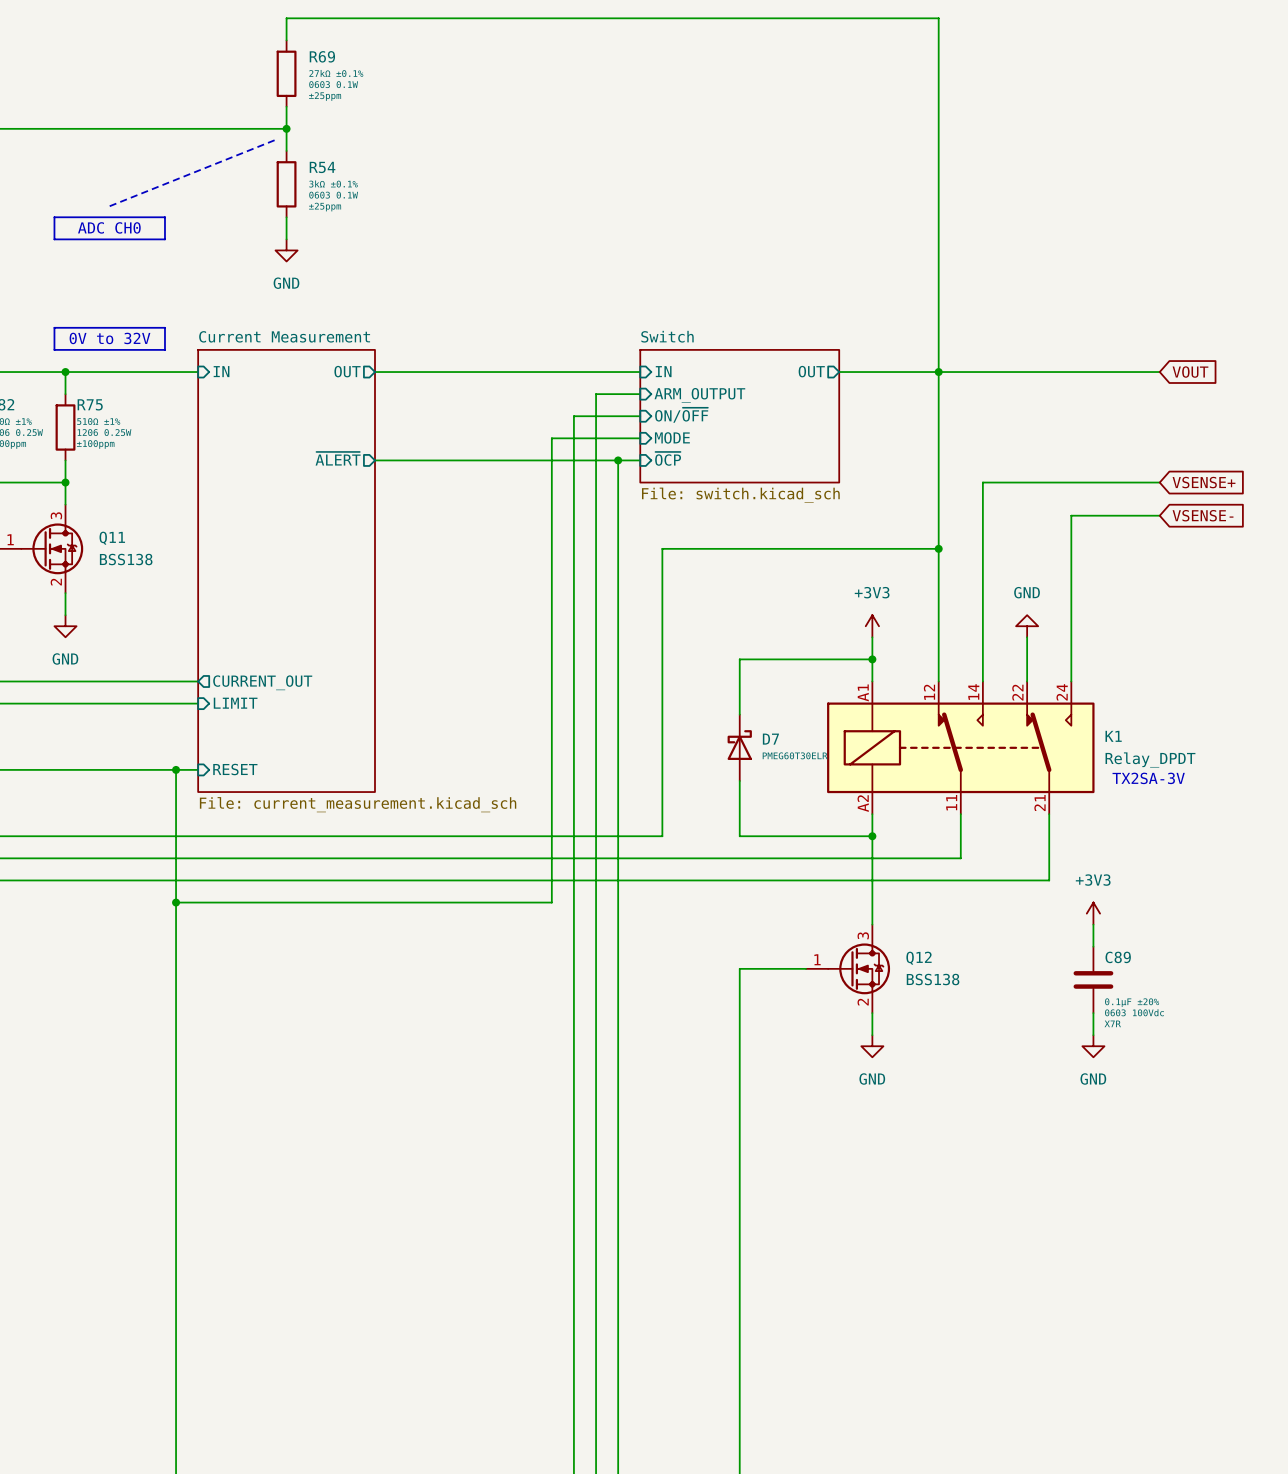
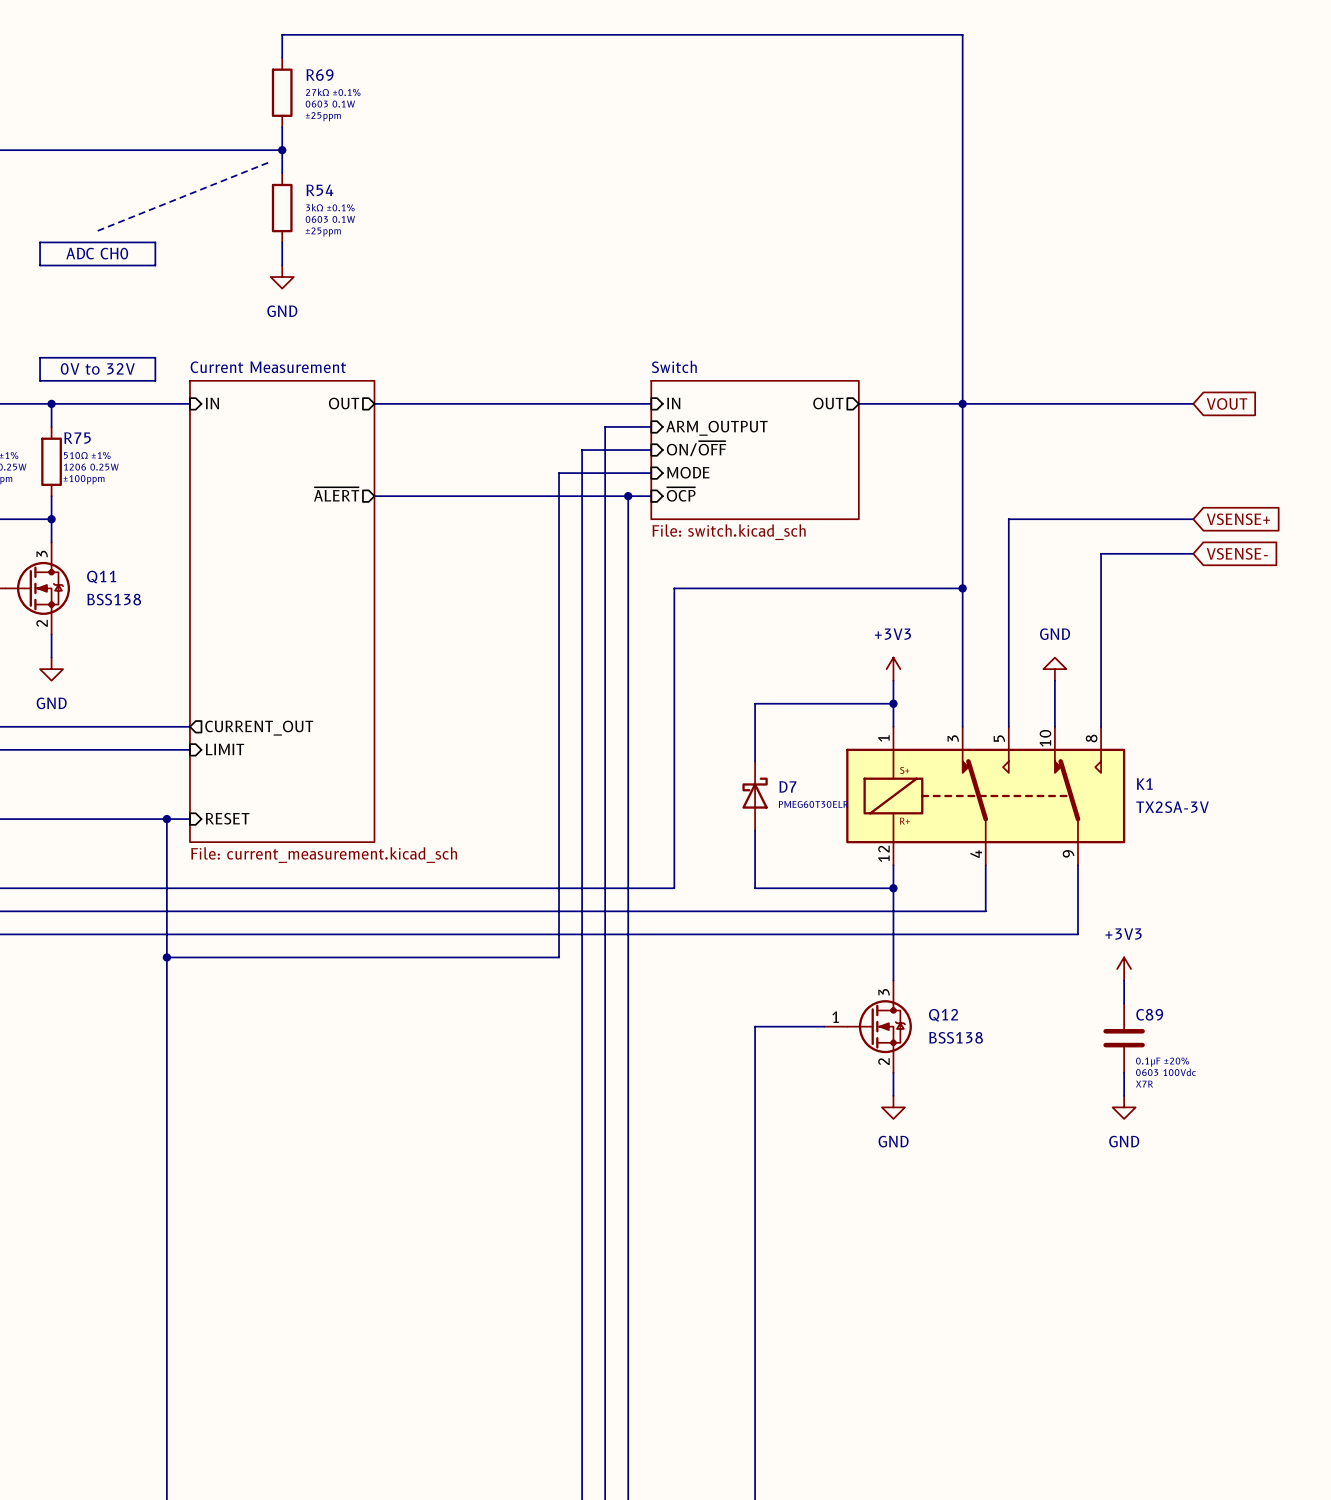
K1 symbol: [827, 681, 1095, 815] -> [846, 726, 1126, 866]
K1 value: Relay_DPDT (1150, 759) -> TX2SA-3V (1172, 807)
text: TX2SA-3V (1148, 778) -> none

